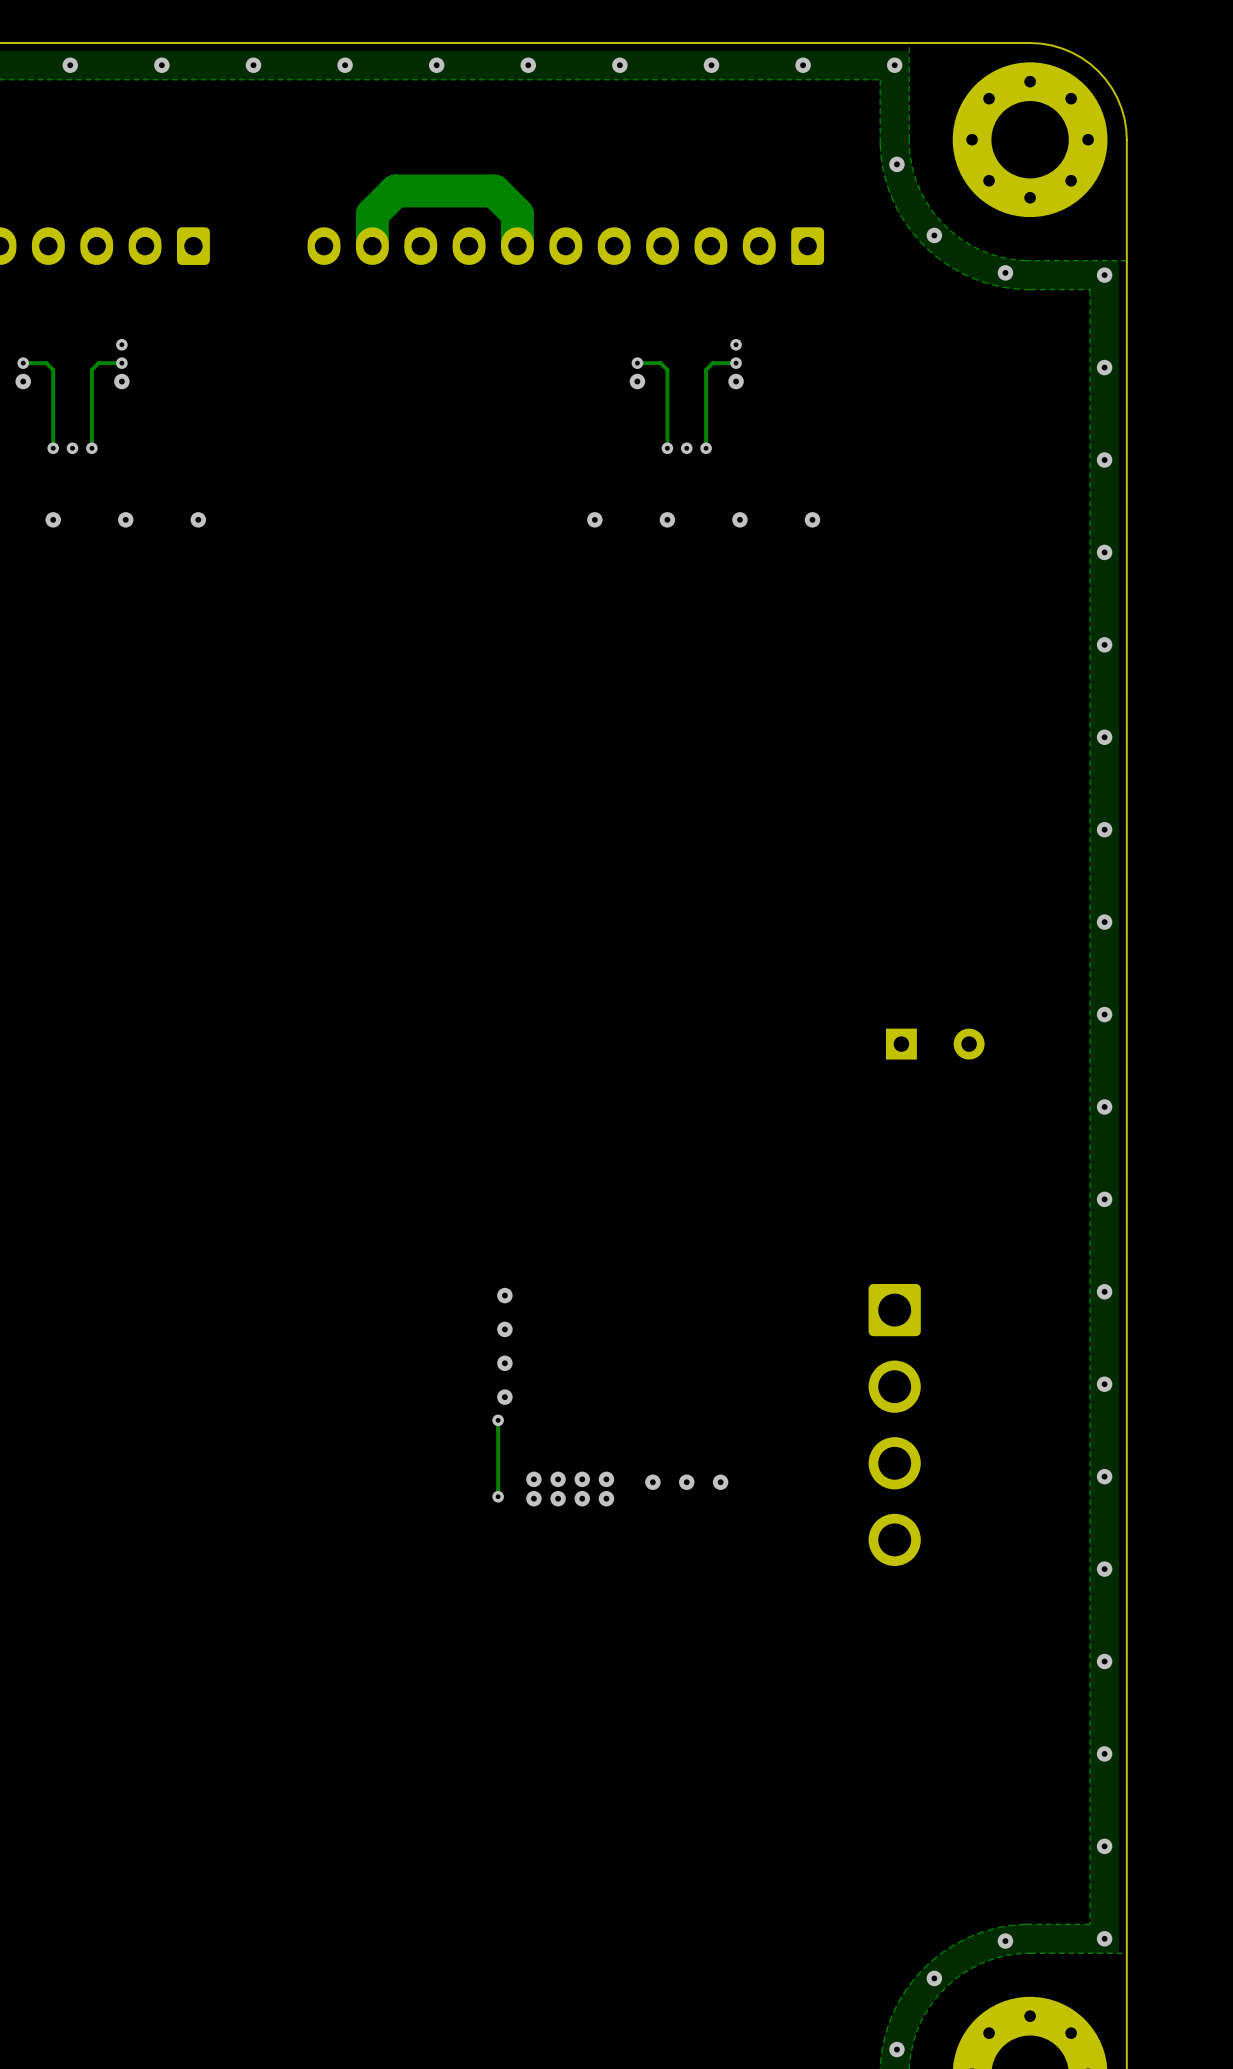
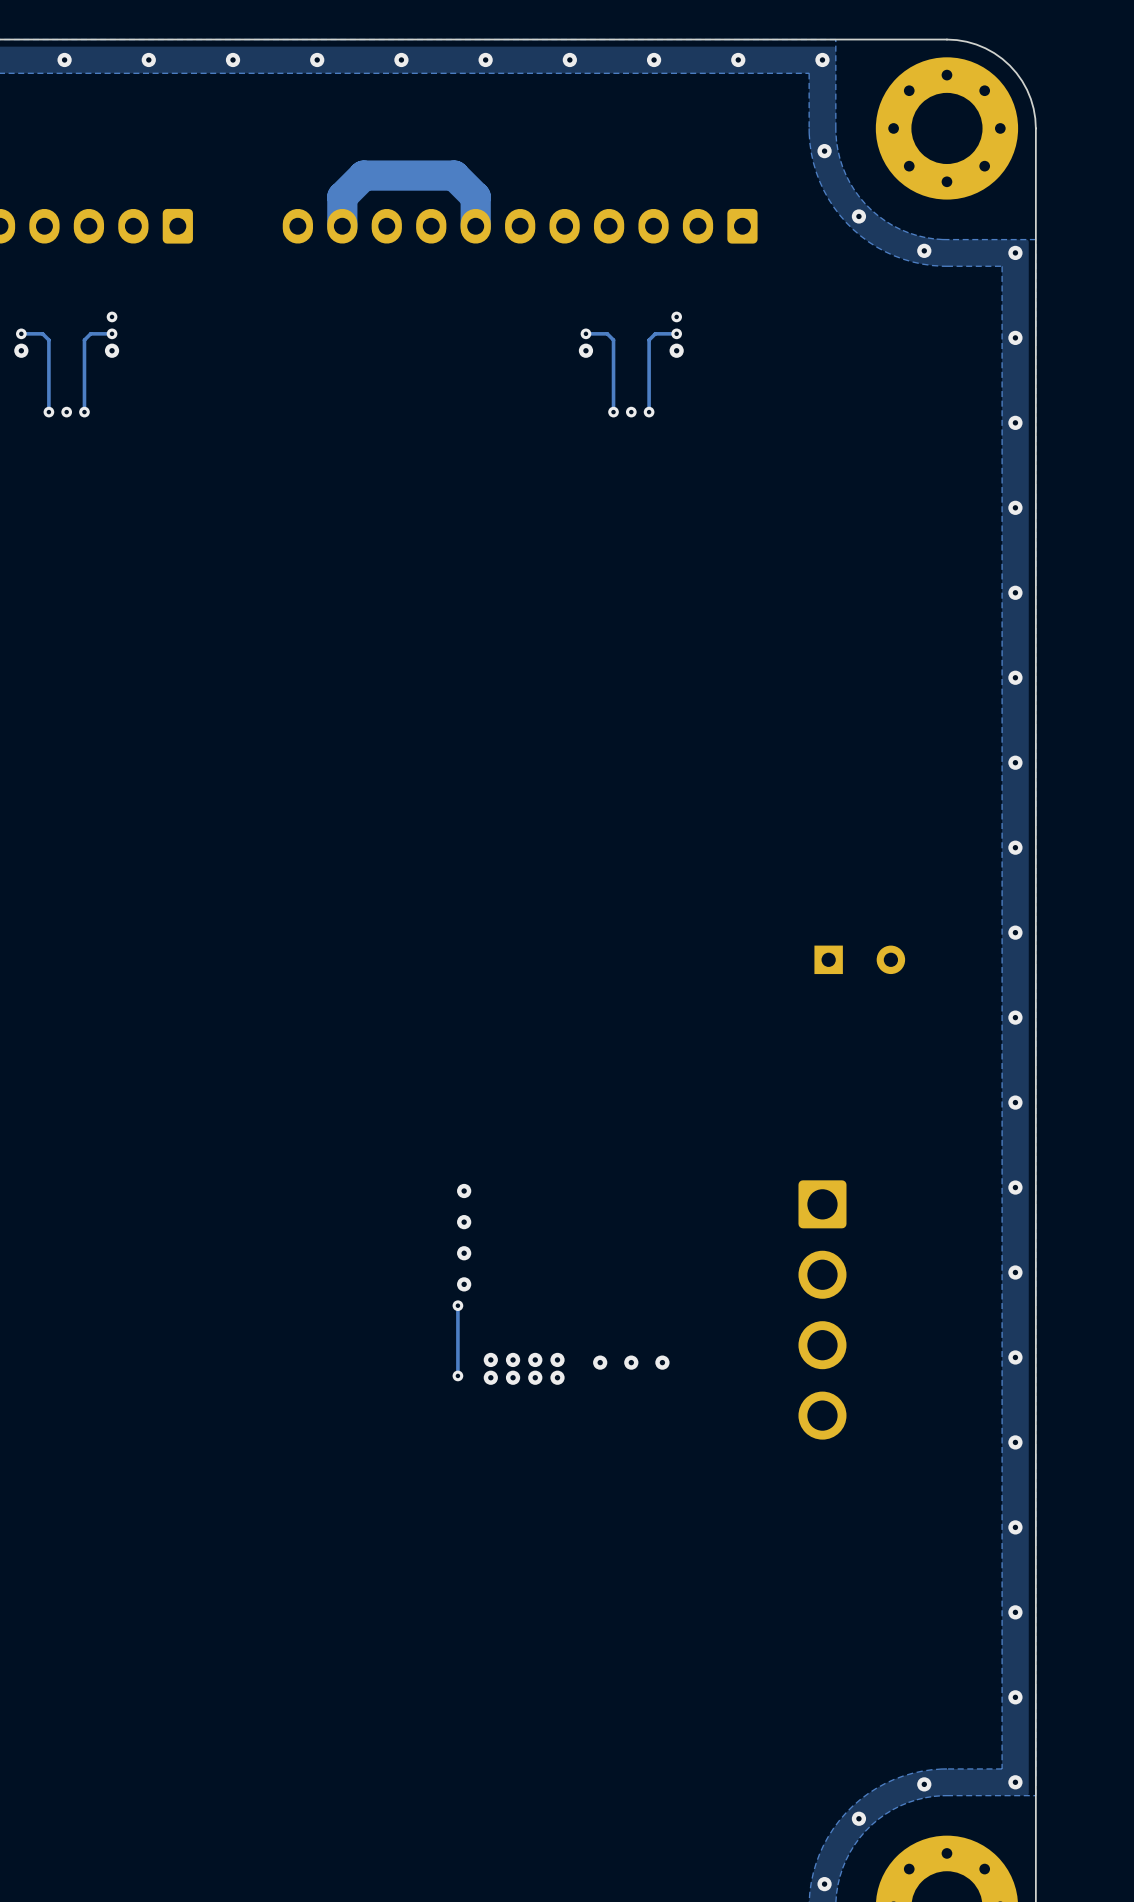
via: (53, 519) -> none
via: (125, 519) -> none
via: (198, 519) -> none
via: (594, 519) -> none
via: (667, 519) -> none
via: (739, 519) -> none
via: (812, 519) -> none

